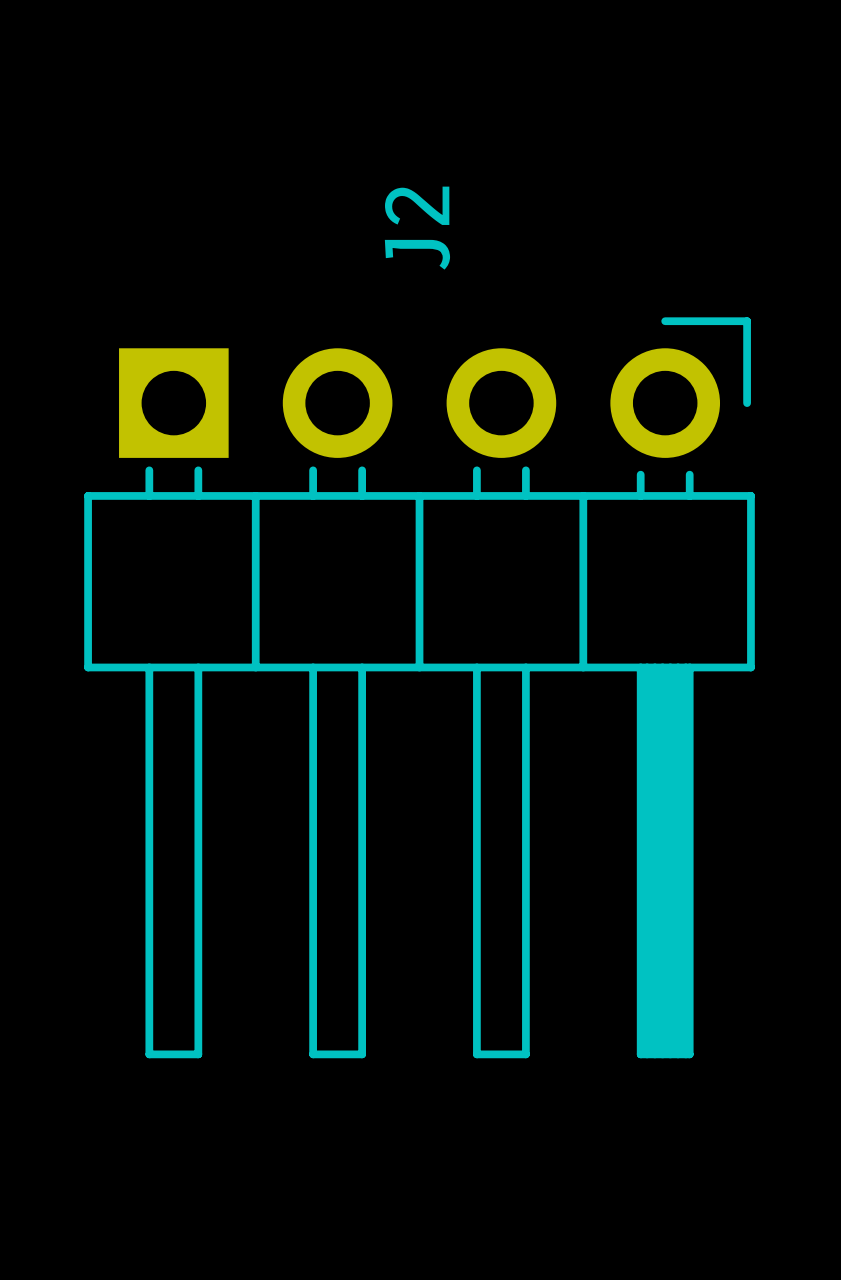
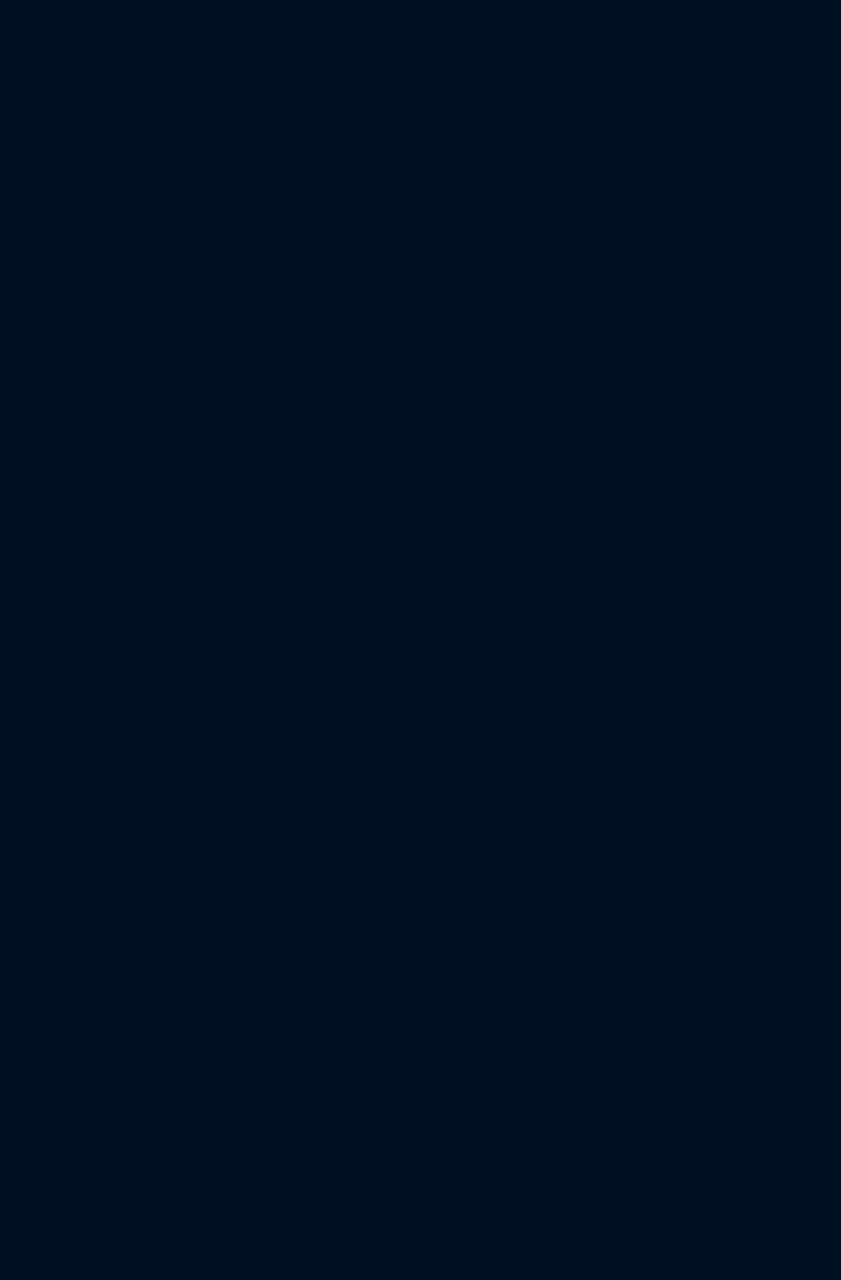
J2: (419, 687) -> none

